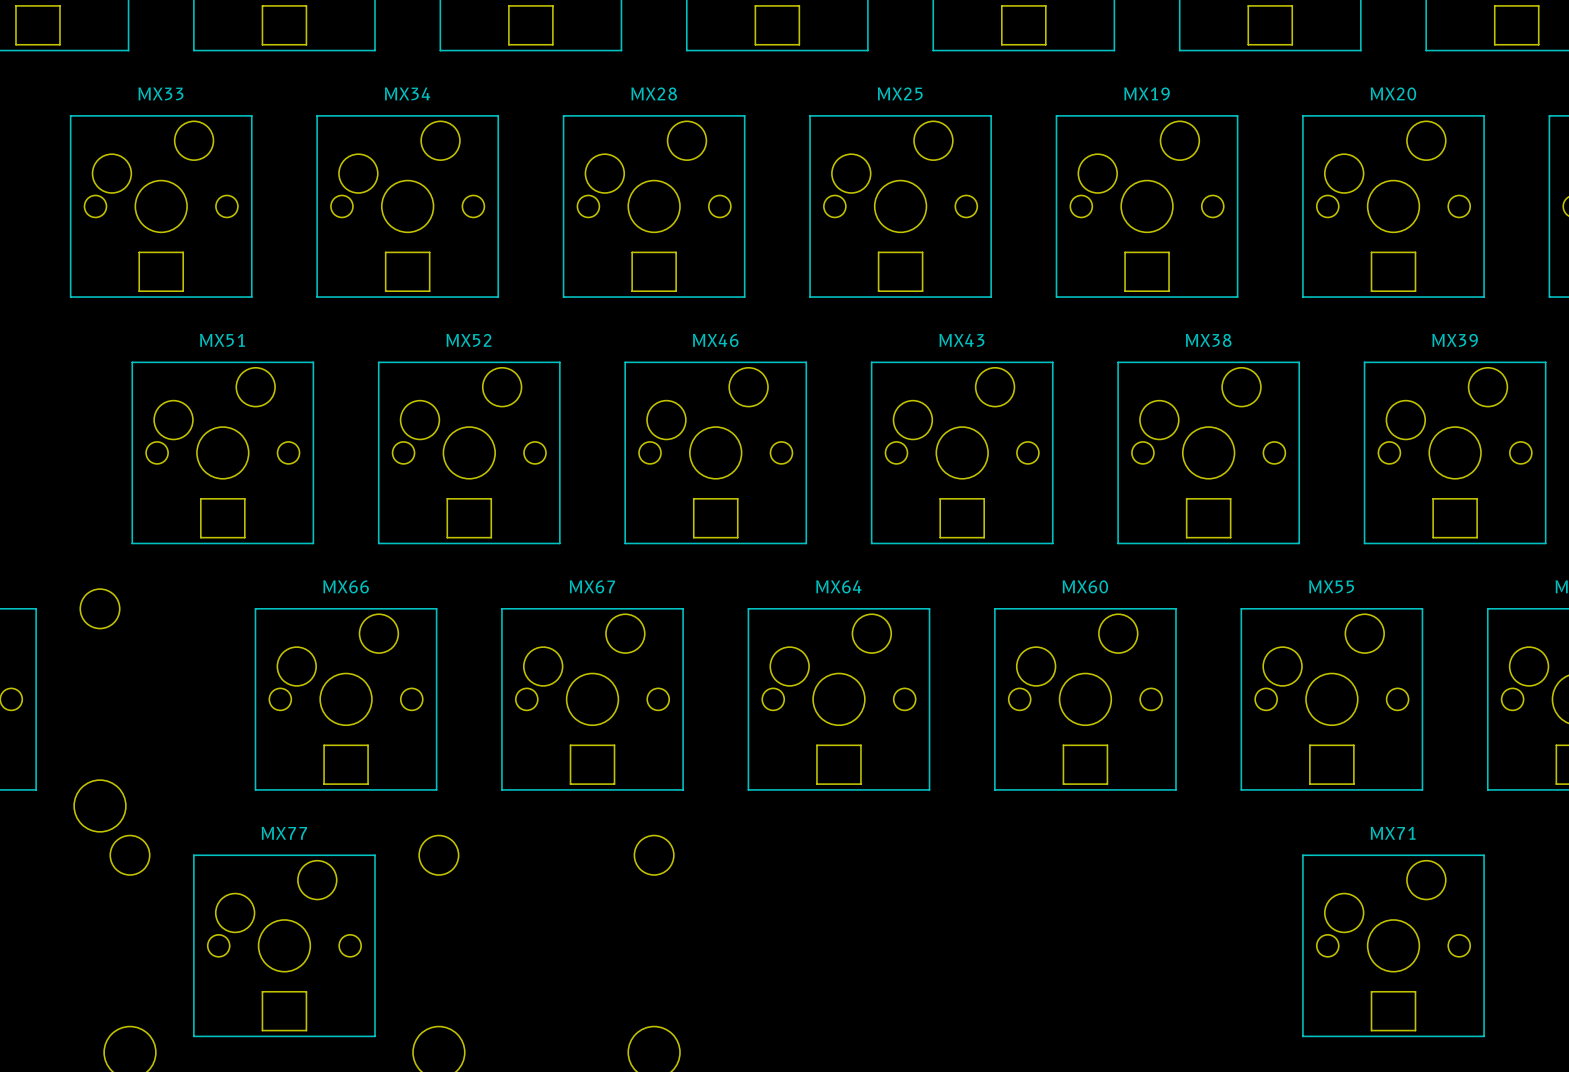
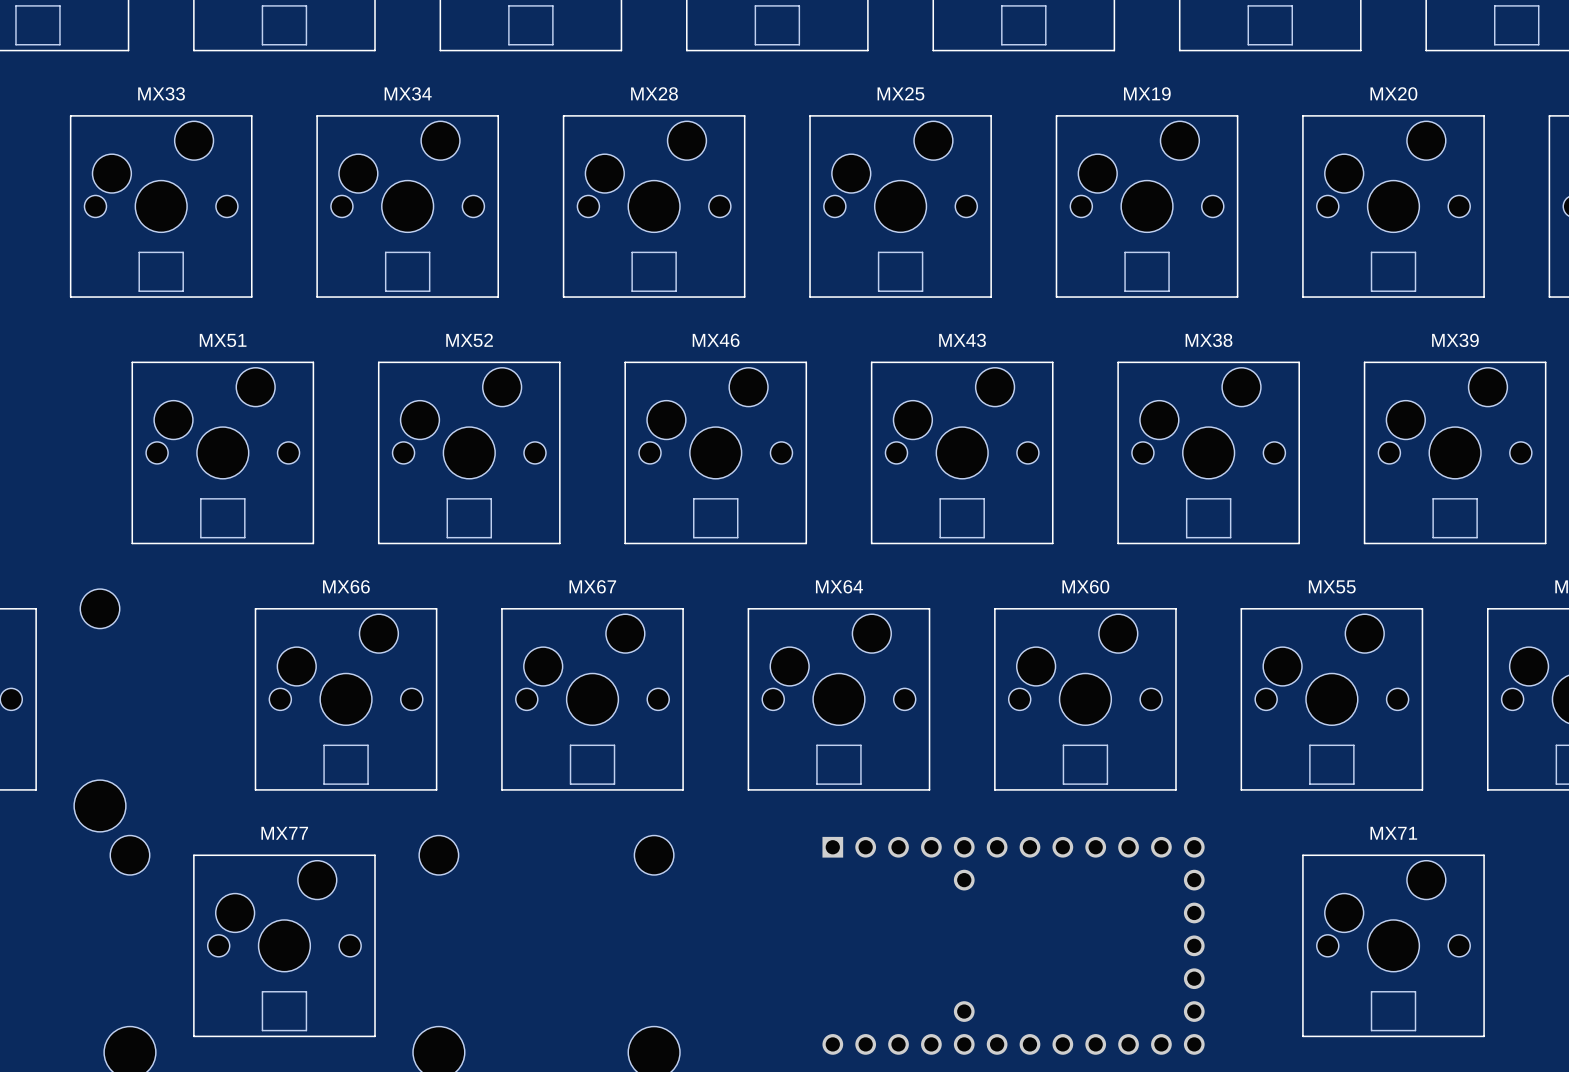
part: none -> (1013, 945)

